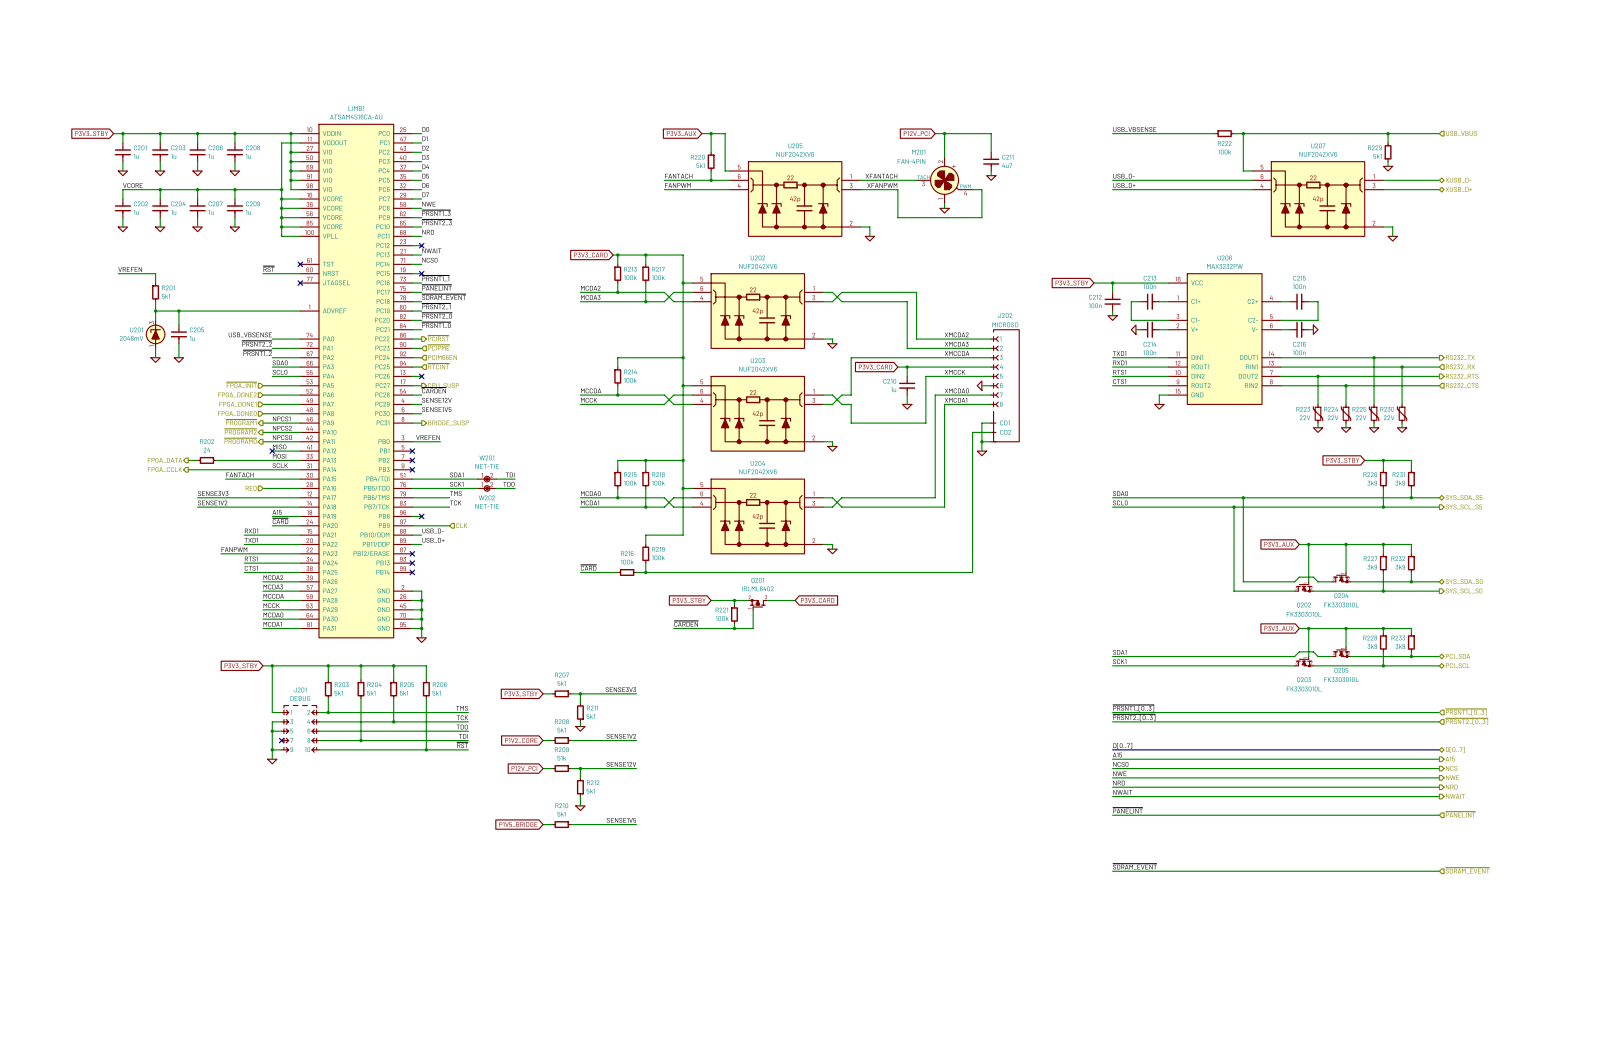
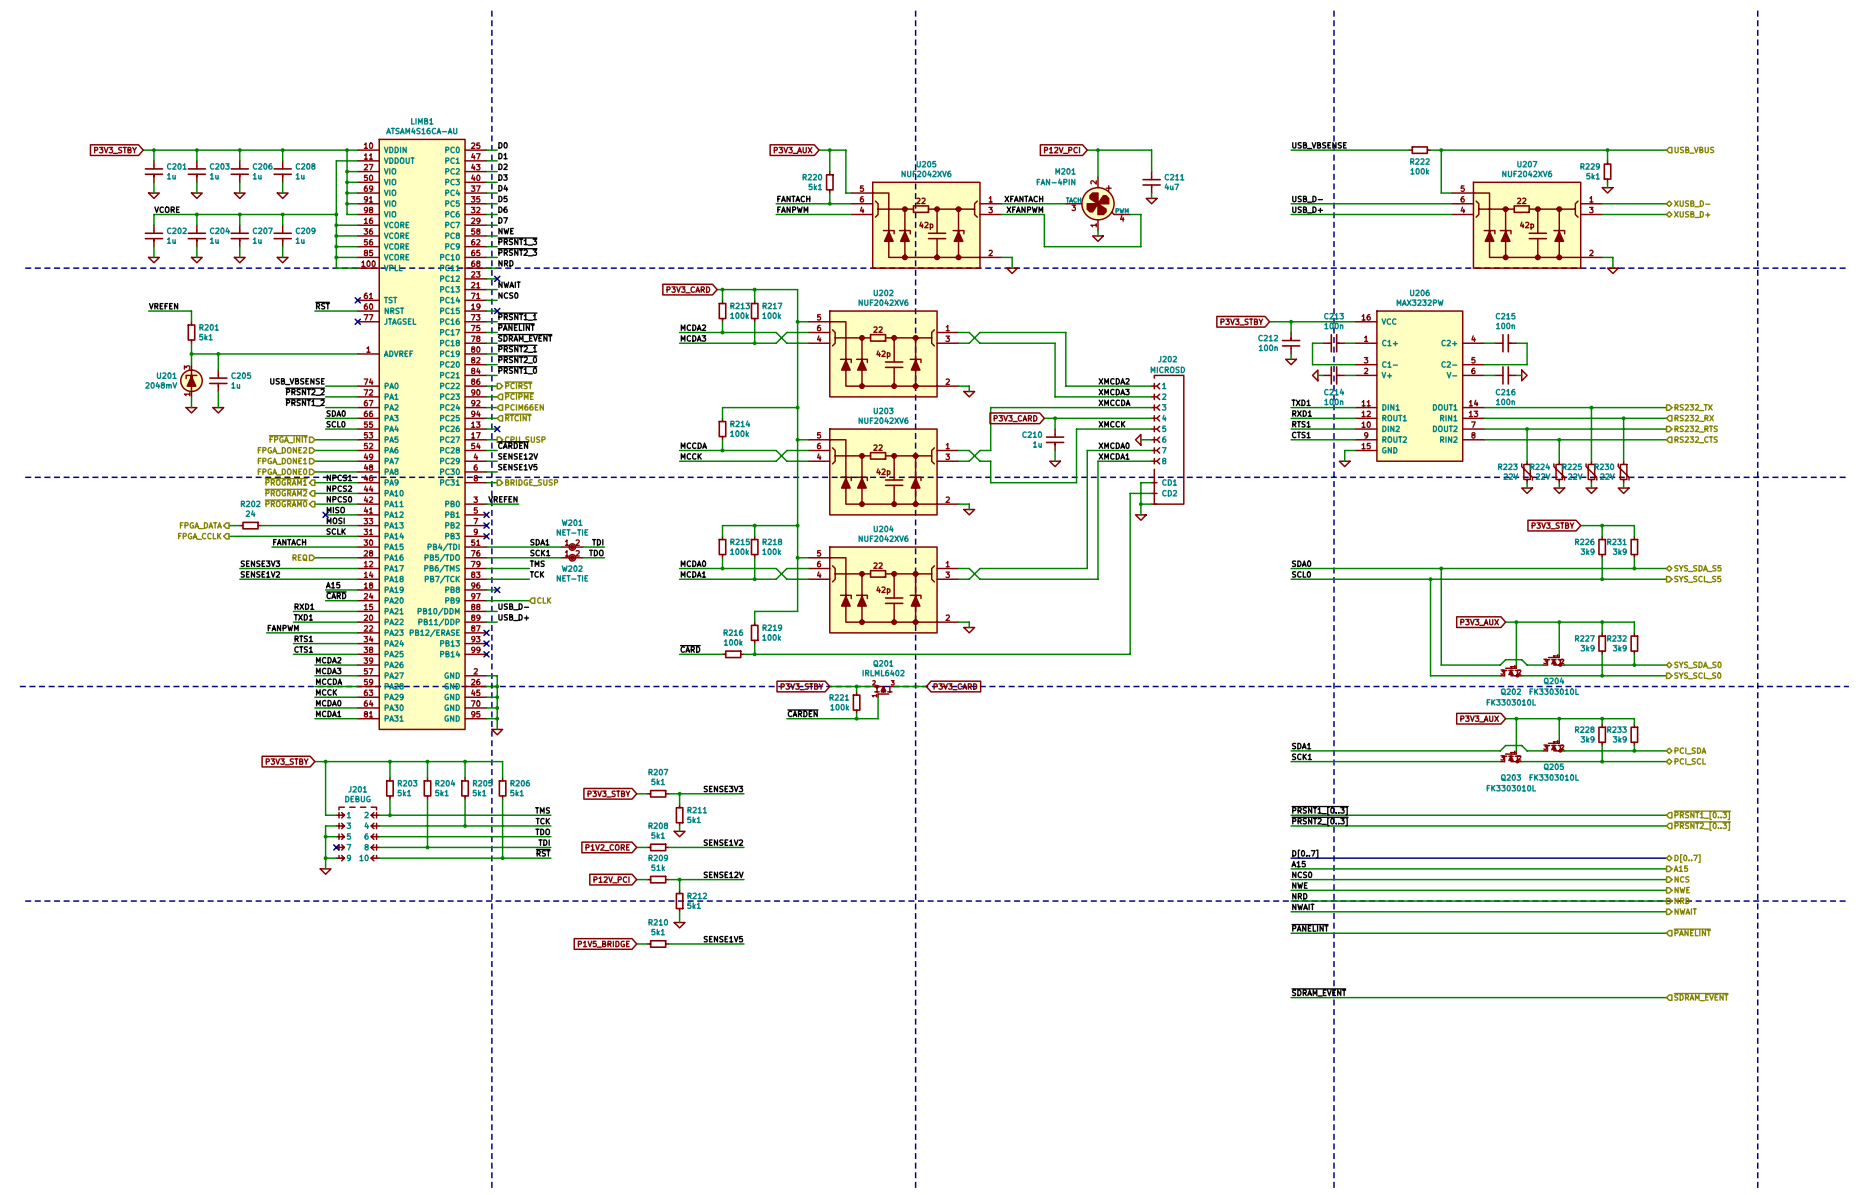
line: none -> (491, 10) (491, 1190)
line: none -> (915, 10) (915, 1190)
line: none -> (1333, 10) (1333, 1190)
line: none -> (1757, 10) (1757, 1190)
line: none -> (25, 268) (1848, 268)
line: none -> (25, 477) (1848, 477)
line: none -> (19, 686) (1848, 686)
line: none -> (25, 901) (1848, 901)

